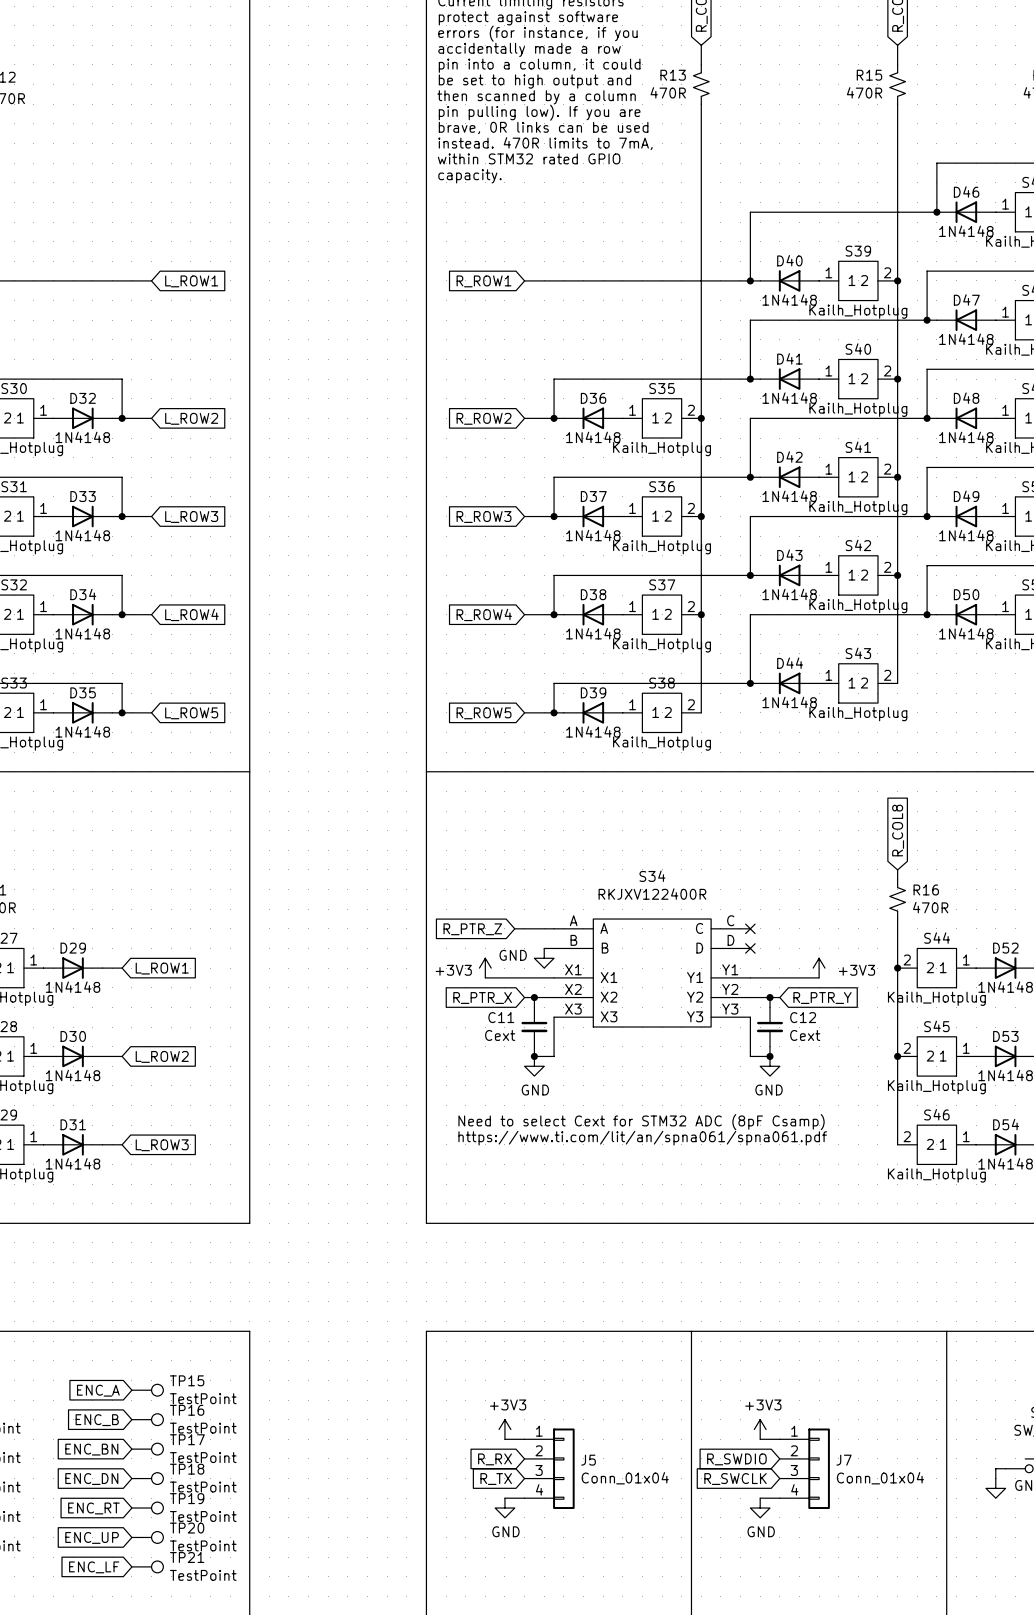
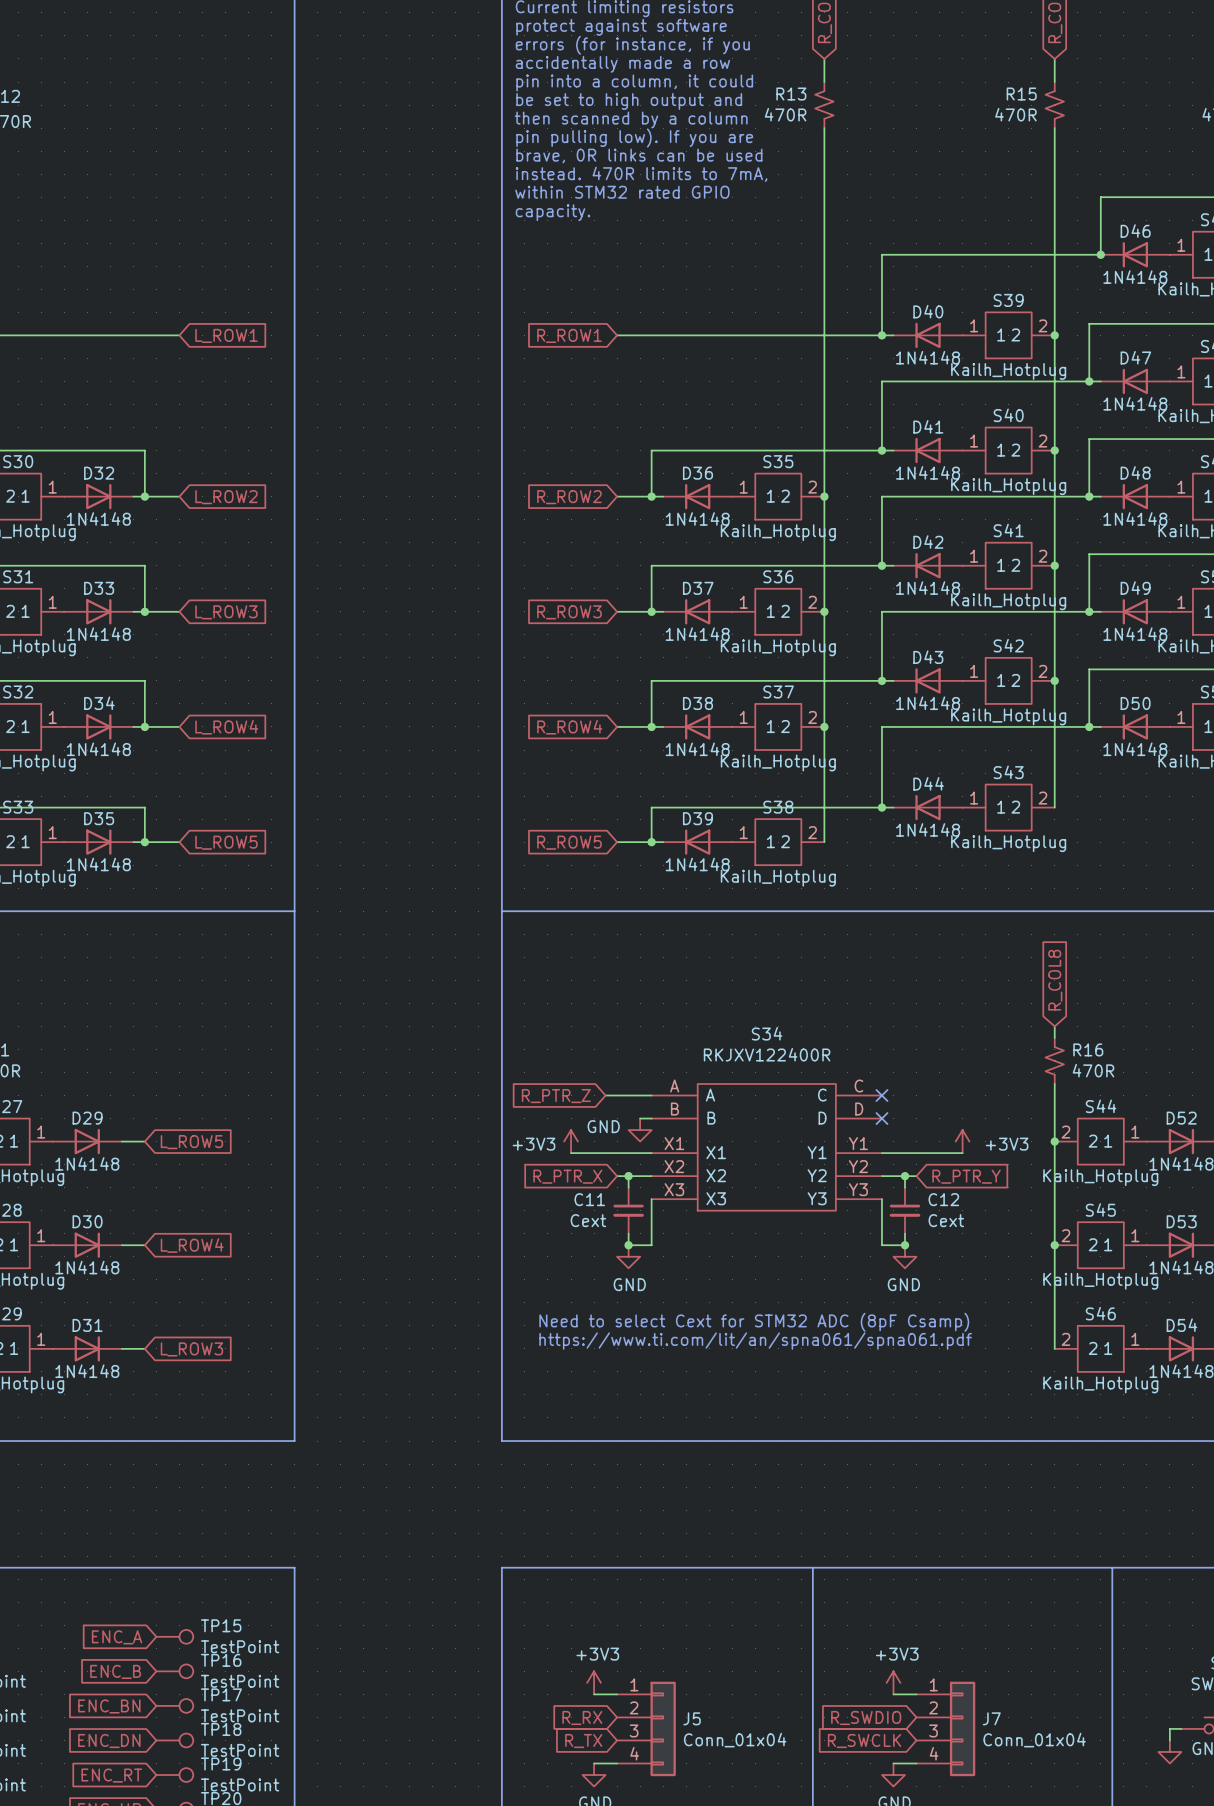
global label: L_ROW1 (162, 968) -> L_ROW5 (191, 1142)
global label: L_ROW2 (162, 1056) -> L_ROW4 (192, 1245)

